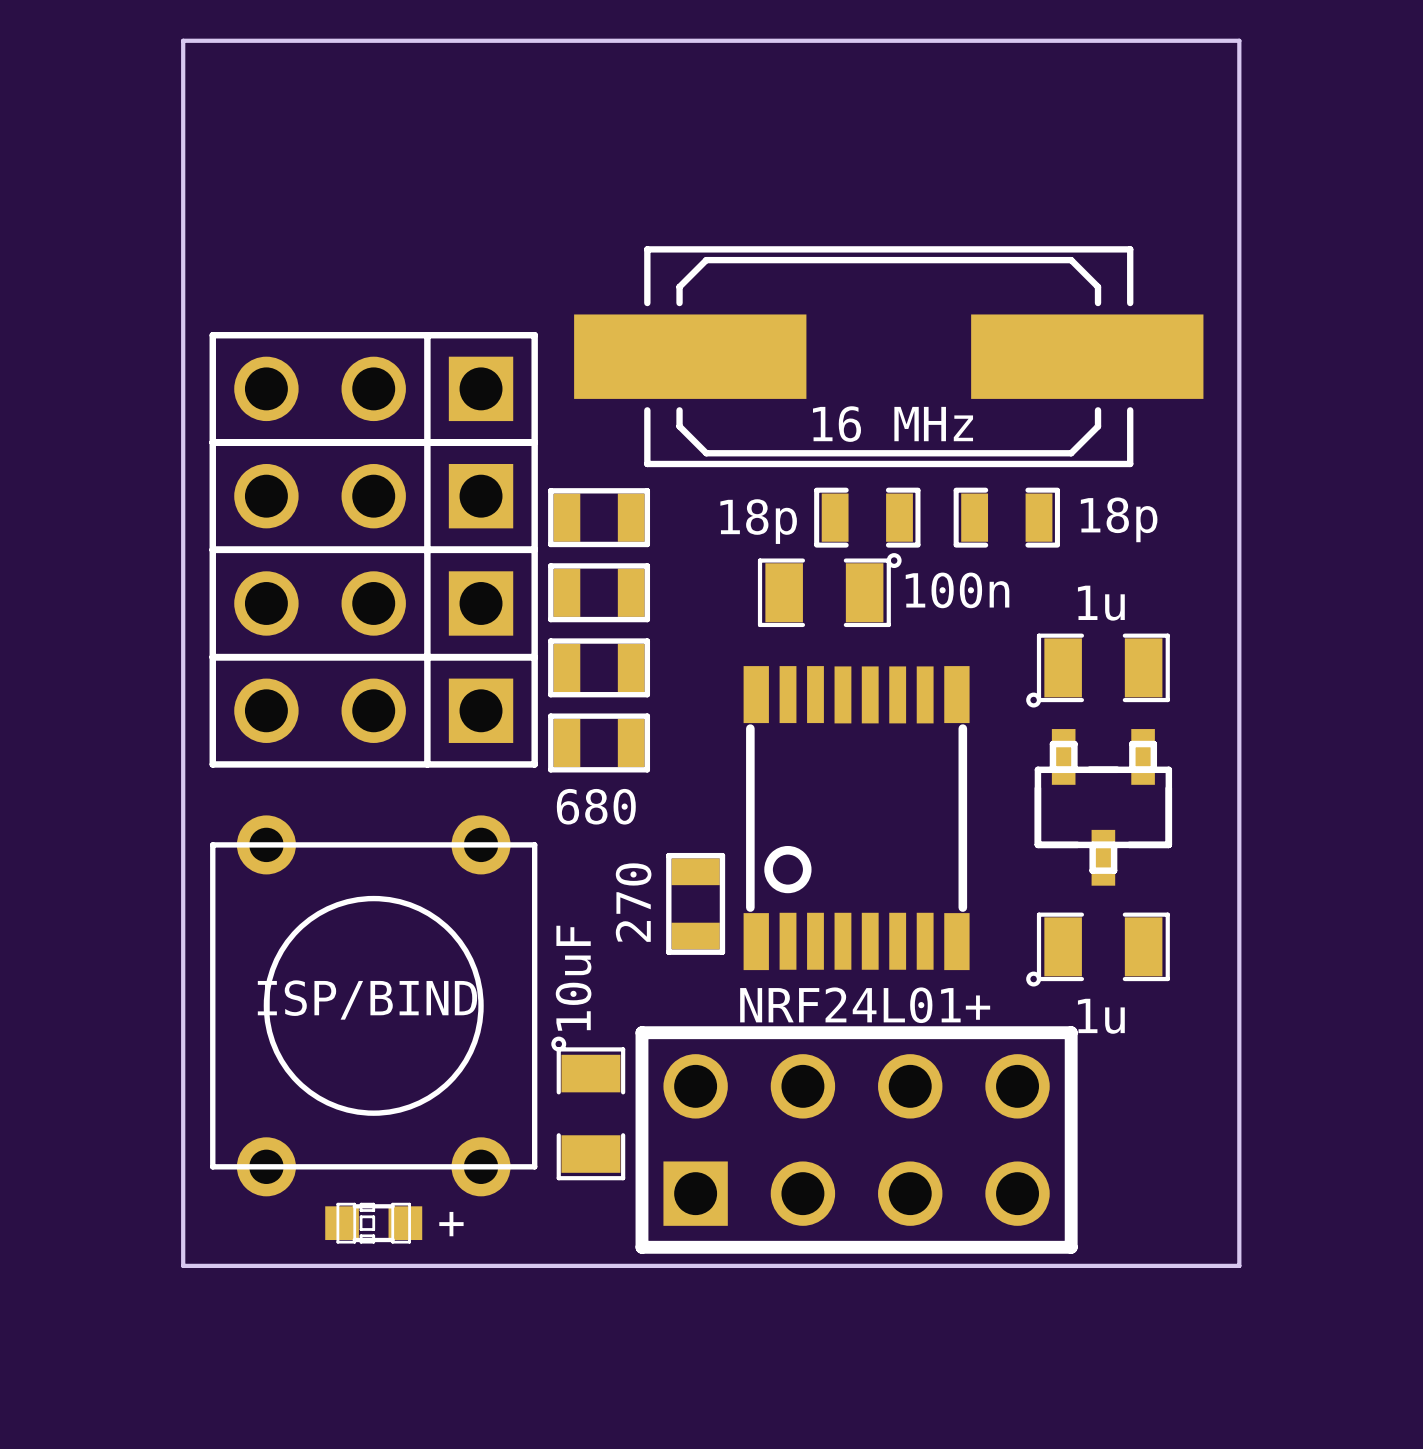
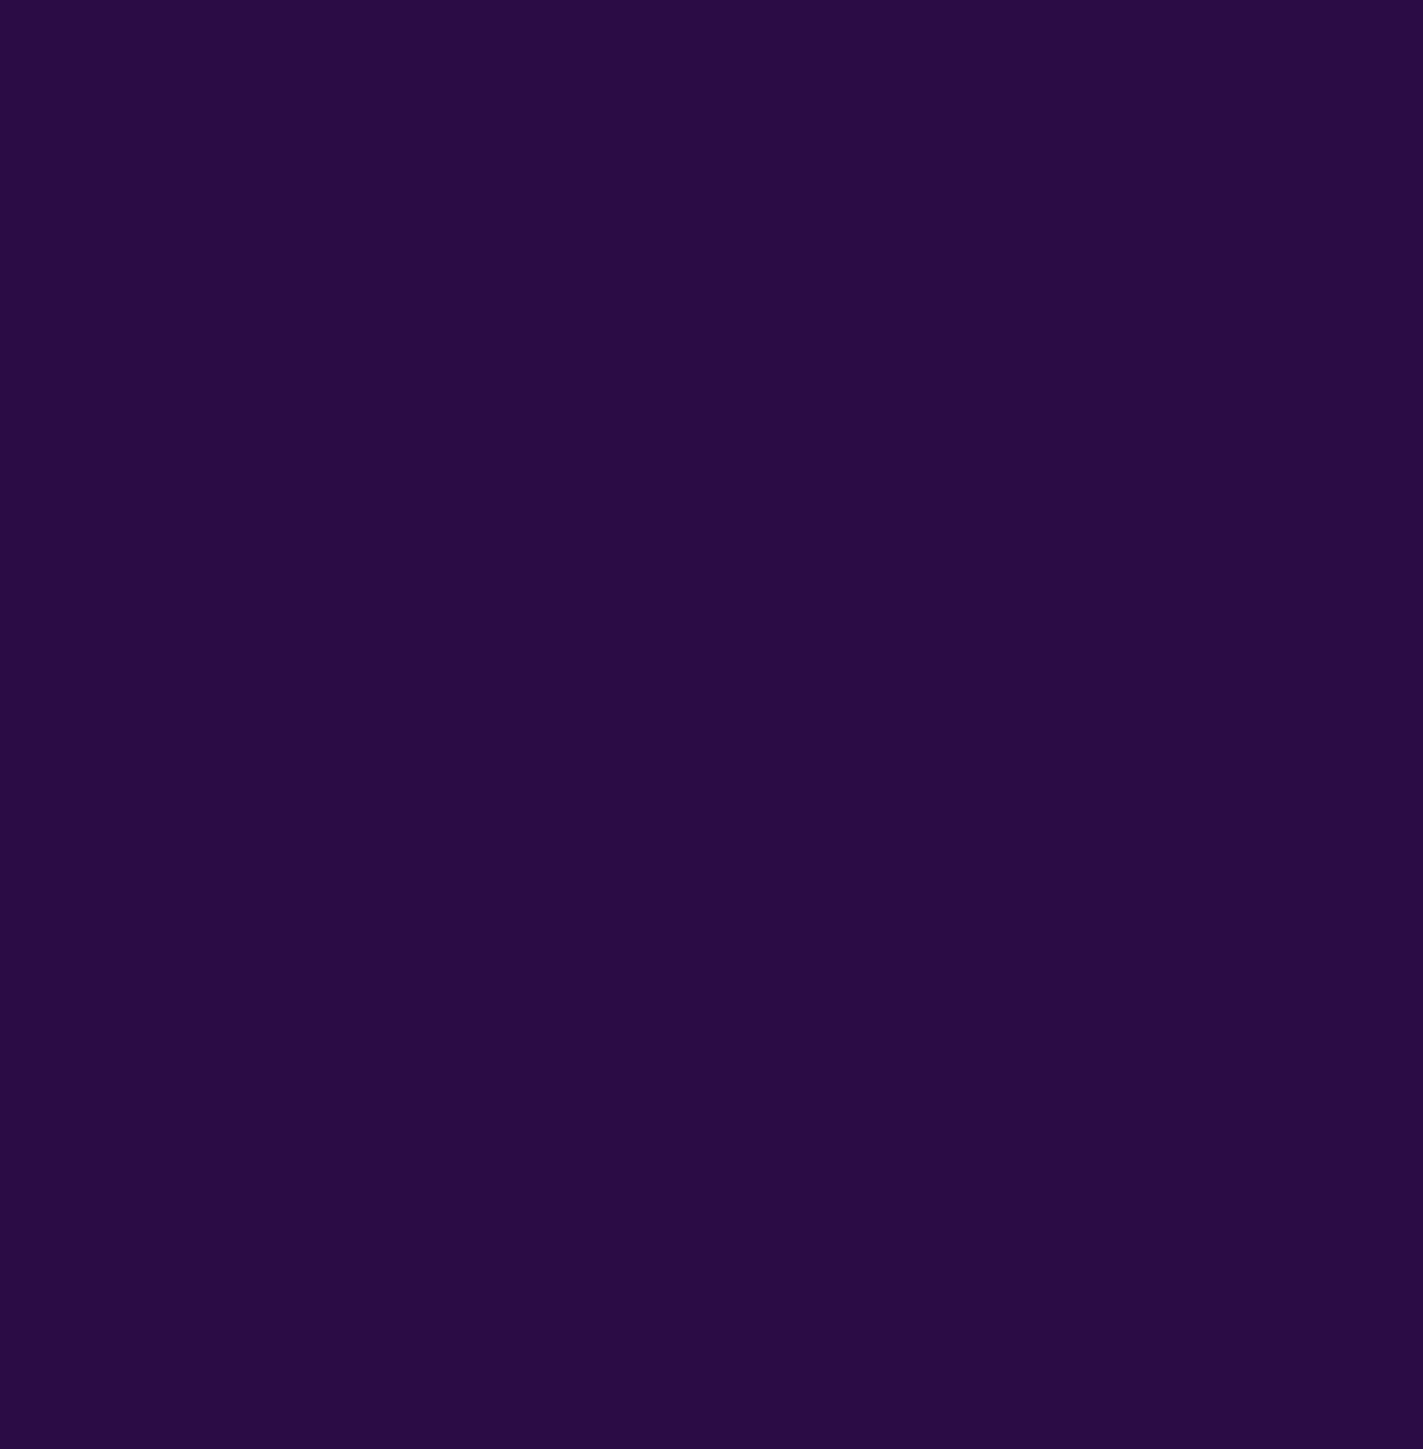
board edge: (183, 40) (183, 1265) (1239, 1265) (1239, 40) (183, 40) -> none
part: 16 MHz (888, 356) -> none
part: (373, 388) -> none
part: (373, 496) -> none
part: (599, 517) -> none
part: 18p (867, 517) -> none
part: 18p (1006, 517) -> none
part: 100n (829, 590) -> none
part: (599, 592) -> none
part: (373, 603) -> none
part: (599, 667) -> none
part: 1u (1098, 670) -> none
part: (373, 710) -> none
part: 680 (599, 742) -> none
part: (1103, 807) -> none
part: (856, 818) -> none
part: 270 (695, 903) -> none
part: 1u (1098, 949) -> none
part: ISP/BIND (373, 1005) -> none
part: 10uF (588, 1108) -> none
part: NRF24L01+ (856, 1140) -> none
part: (373, 1223) -> none
text: + (451, 1224) -> none

